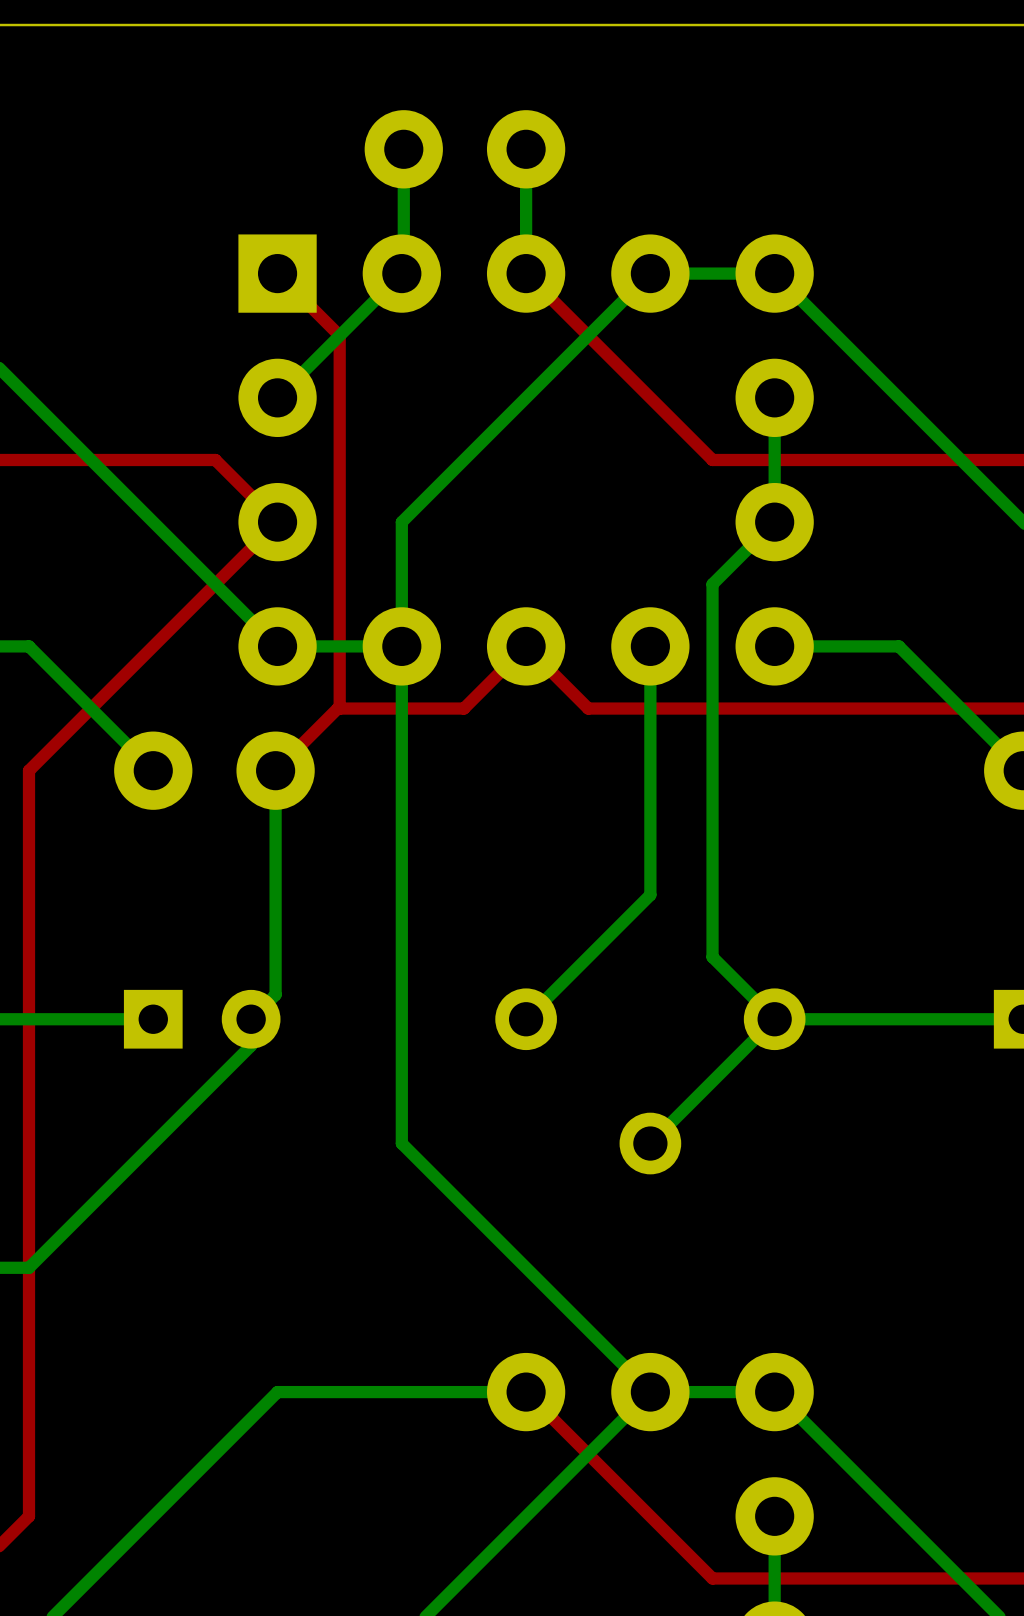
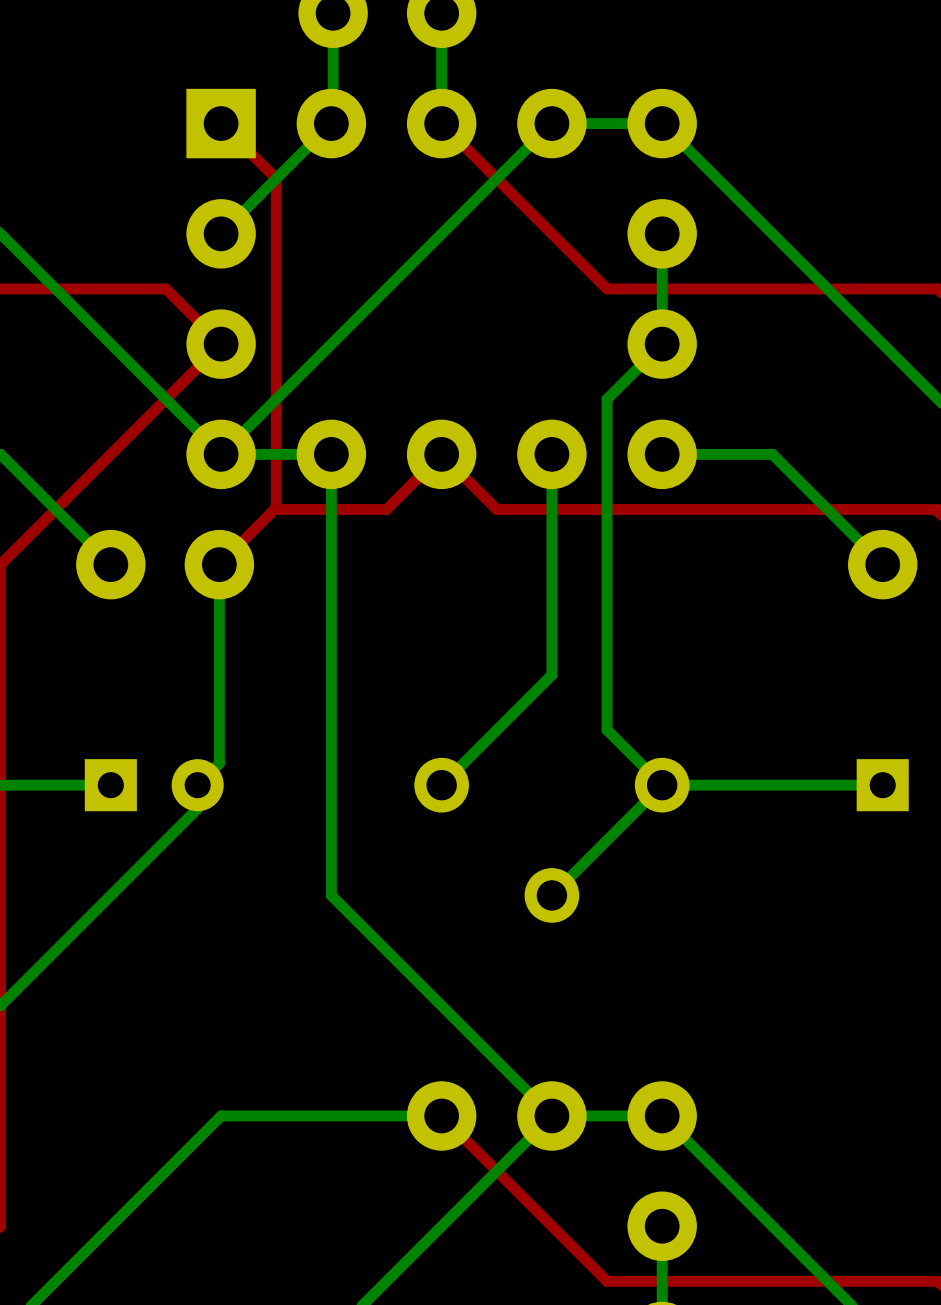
bottom track: (401, 522) (401, 646) -> (331, 344) (221, 454)

